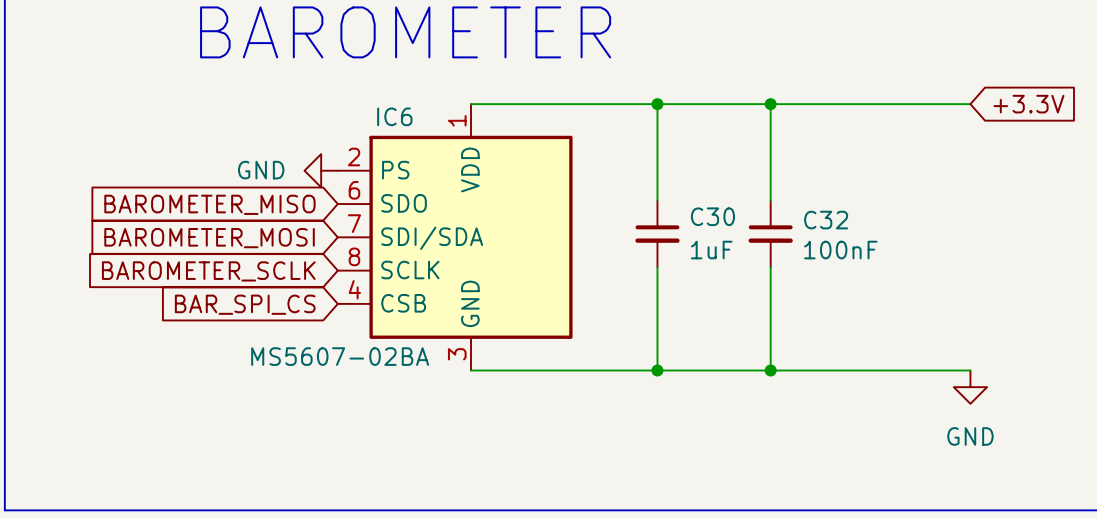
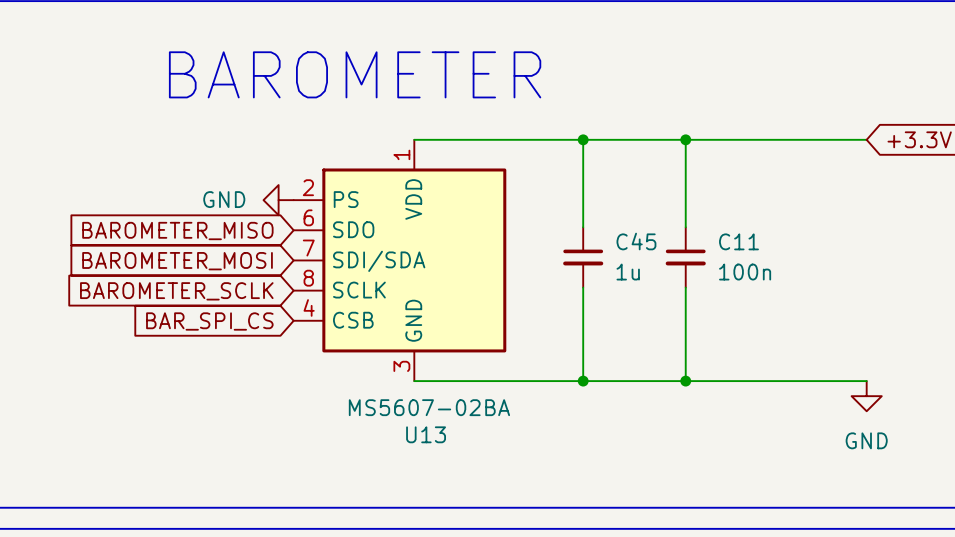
IC6 name: IC6 (394, 116) -> U13 (426, 434)
C30 name: C30 (712, 216) -> C45 (636, 241)
C32 name: C32 (826, 220) -> C11 (738, 241)
C30 value: 1uF (711, 250) -> 1u (628, 272)
C32 value: 100nF (840, 250) -> 100n (745, 272)
IC6 value position: MS5607-02BA (340, 356) -> MS5607-02BA (429, 407)

